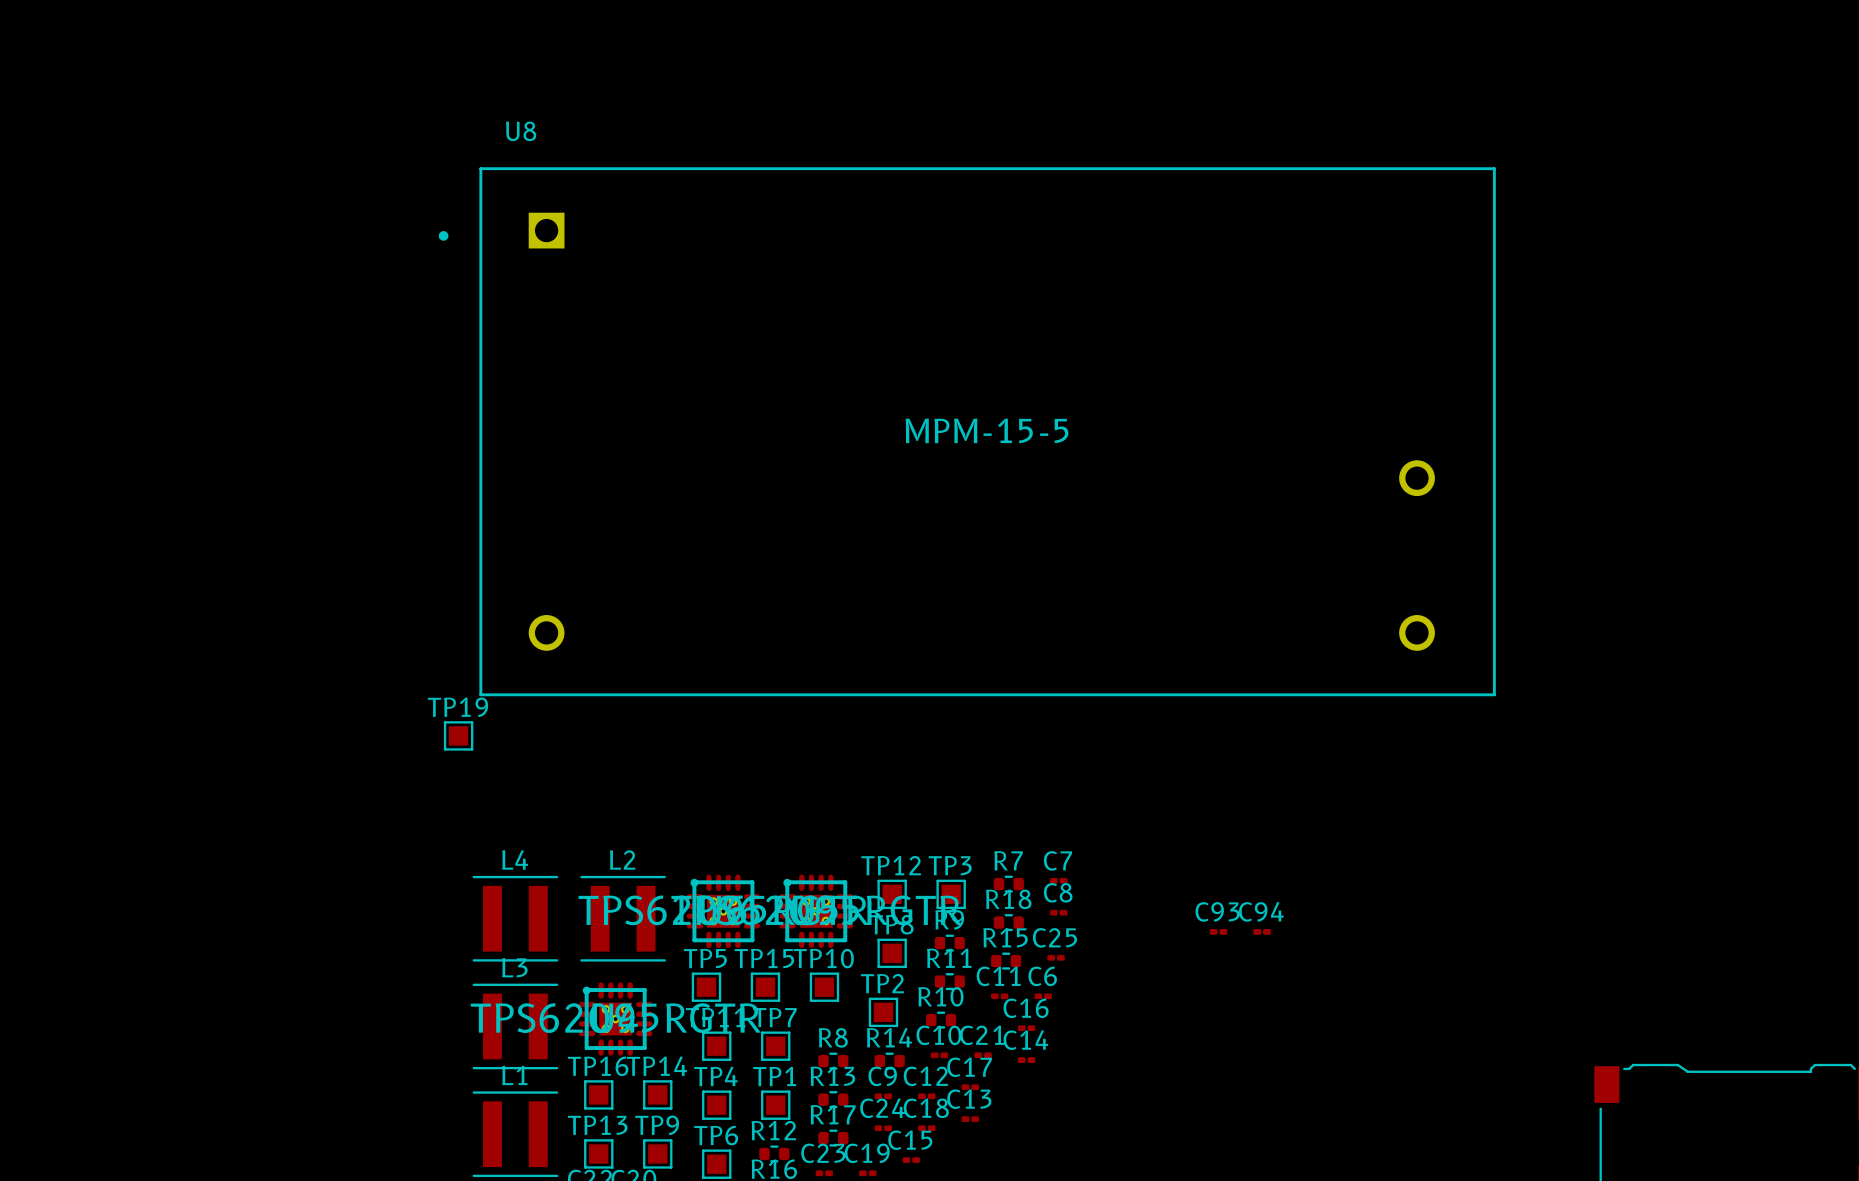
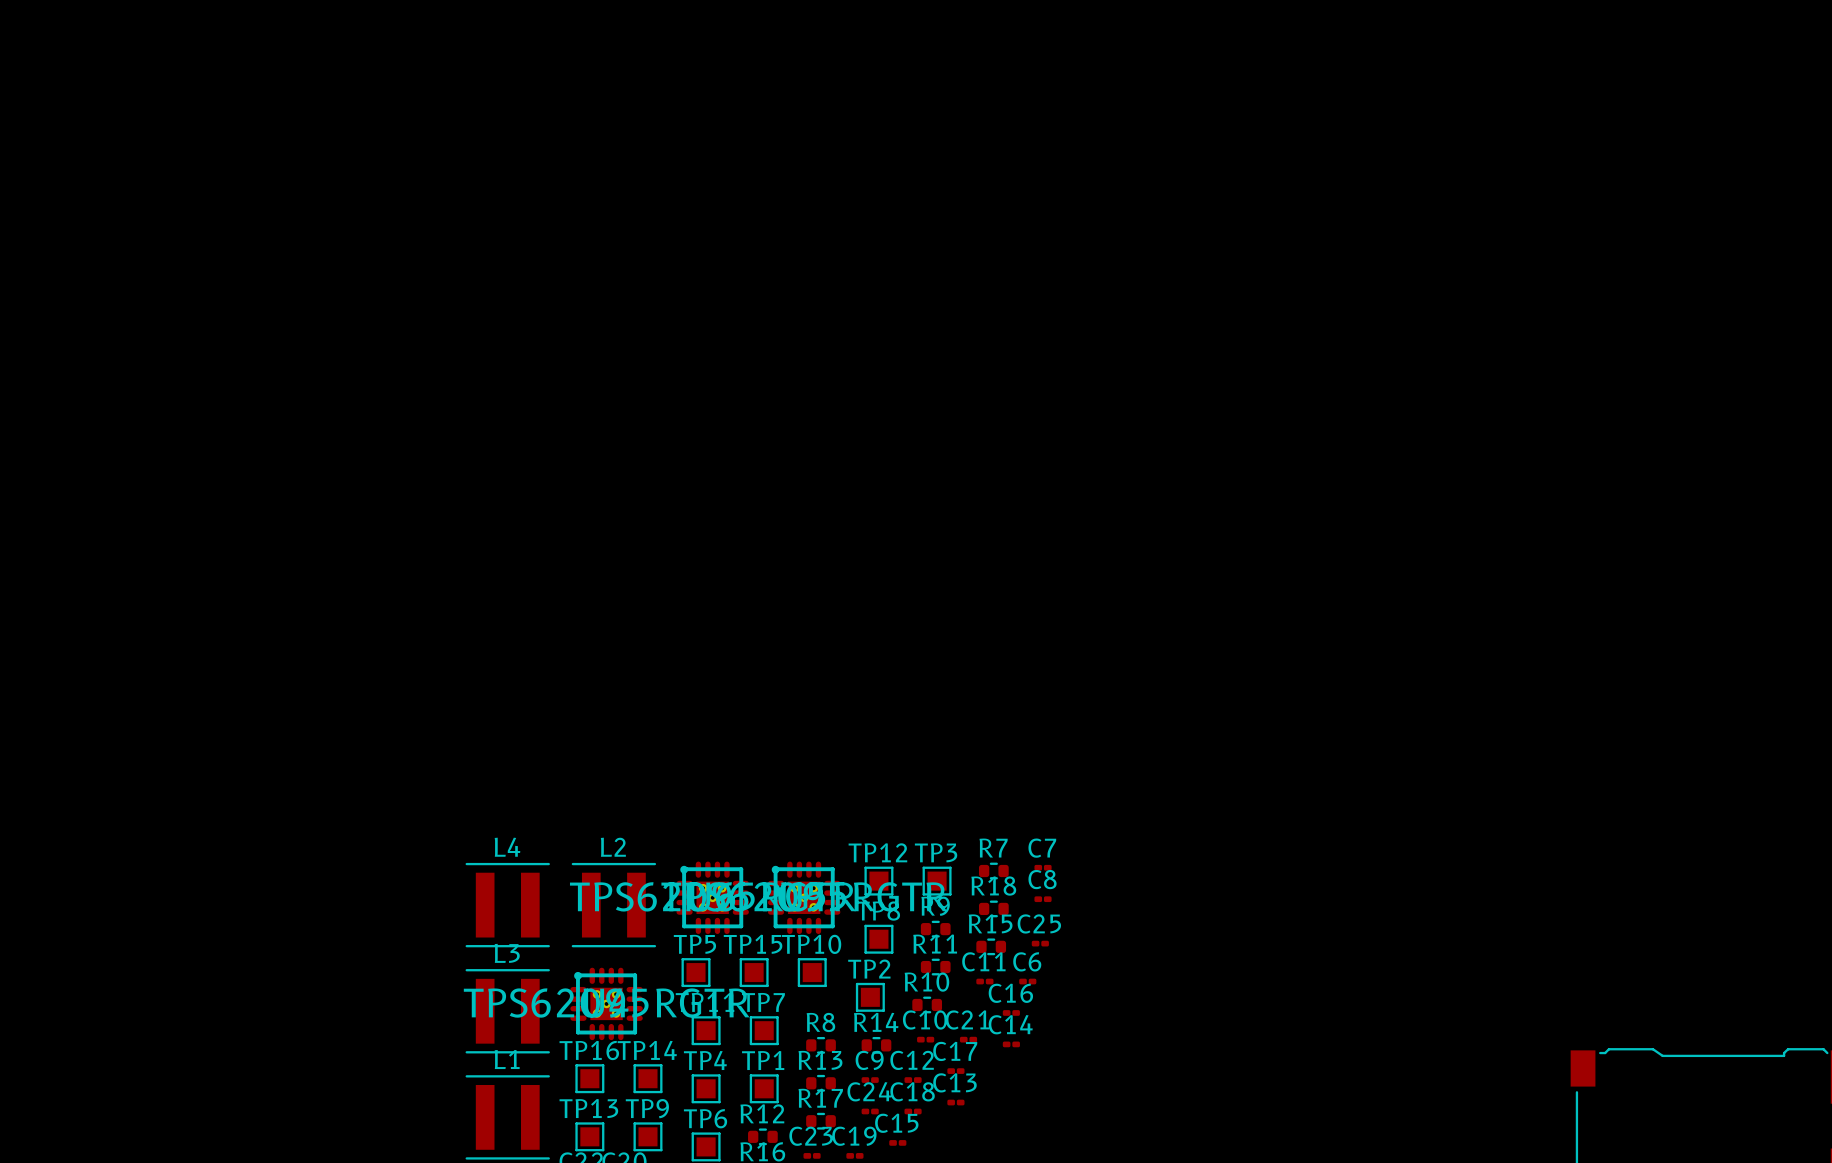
U8: MPM-15-5 (967, 431) -> none
TP19: (458, 735) -> none
C93: (1218, 931) -> none
C94: (1262, 931) -> none

